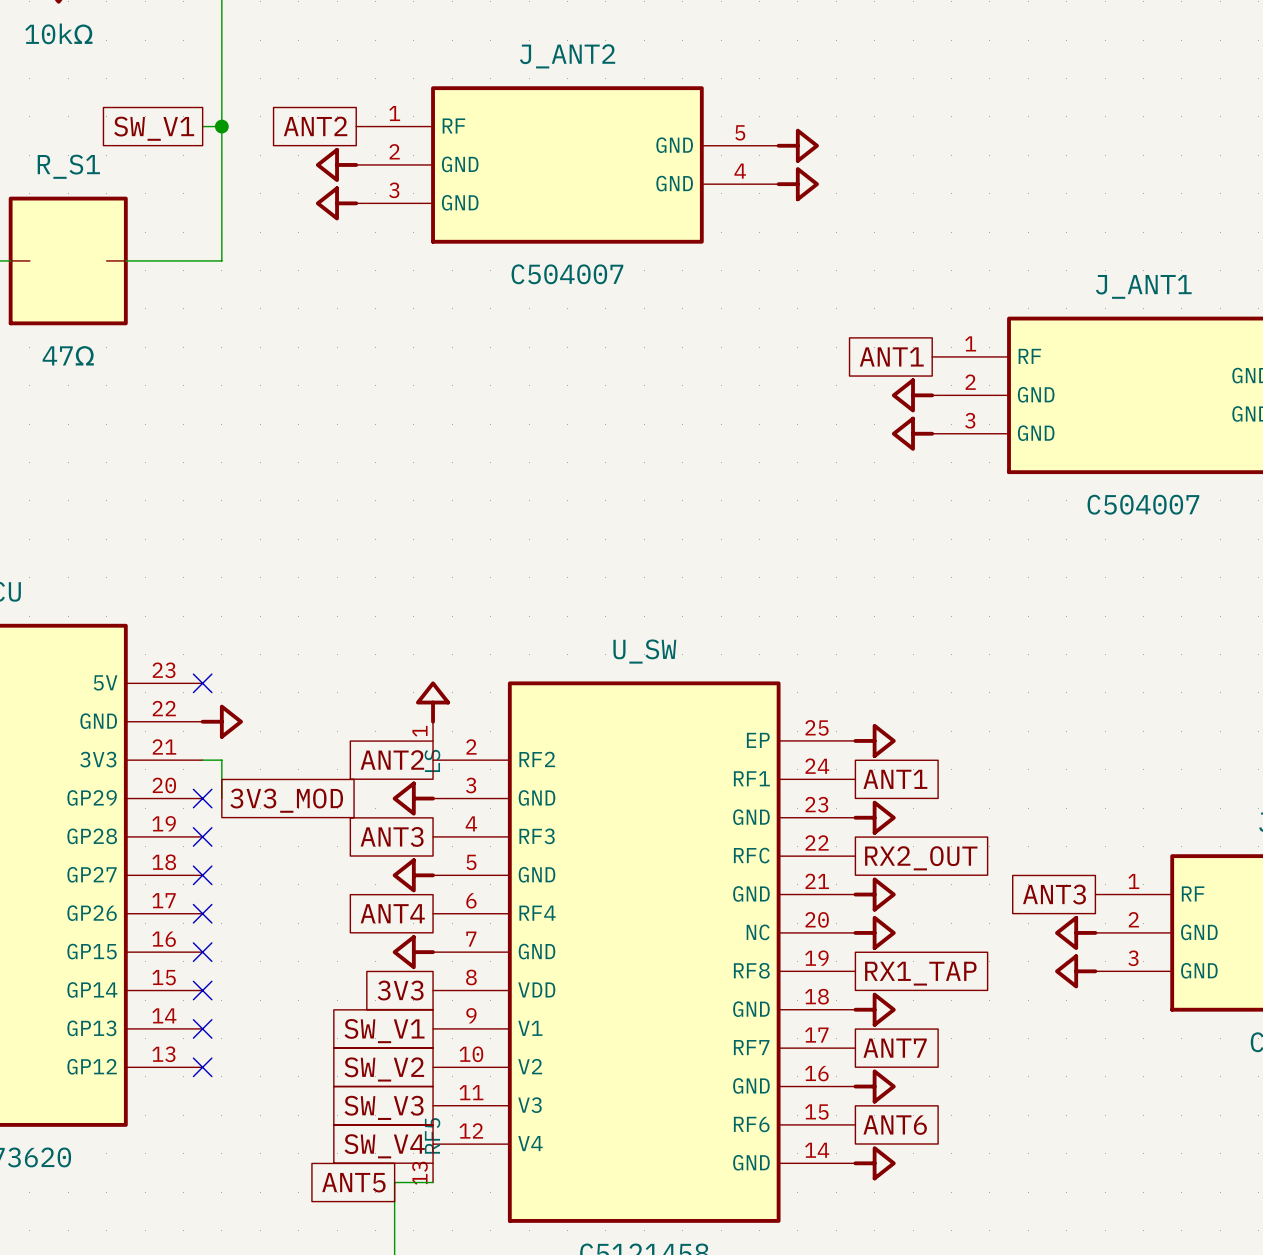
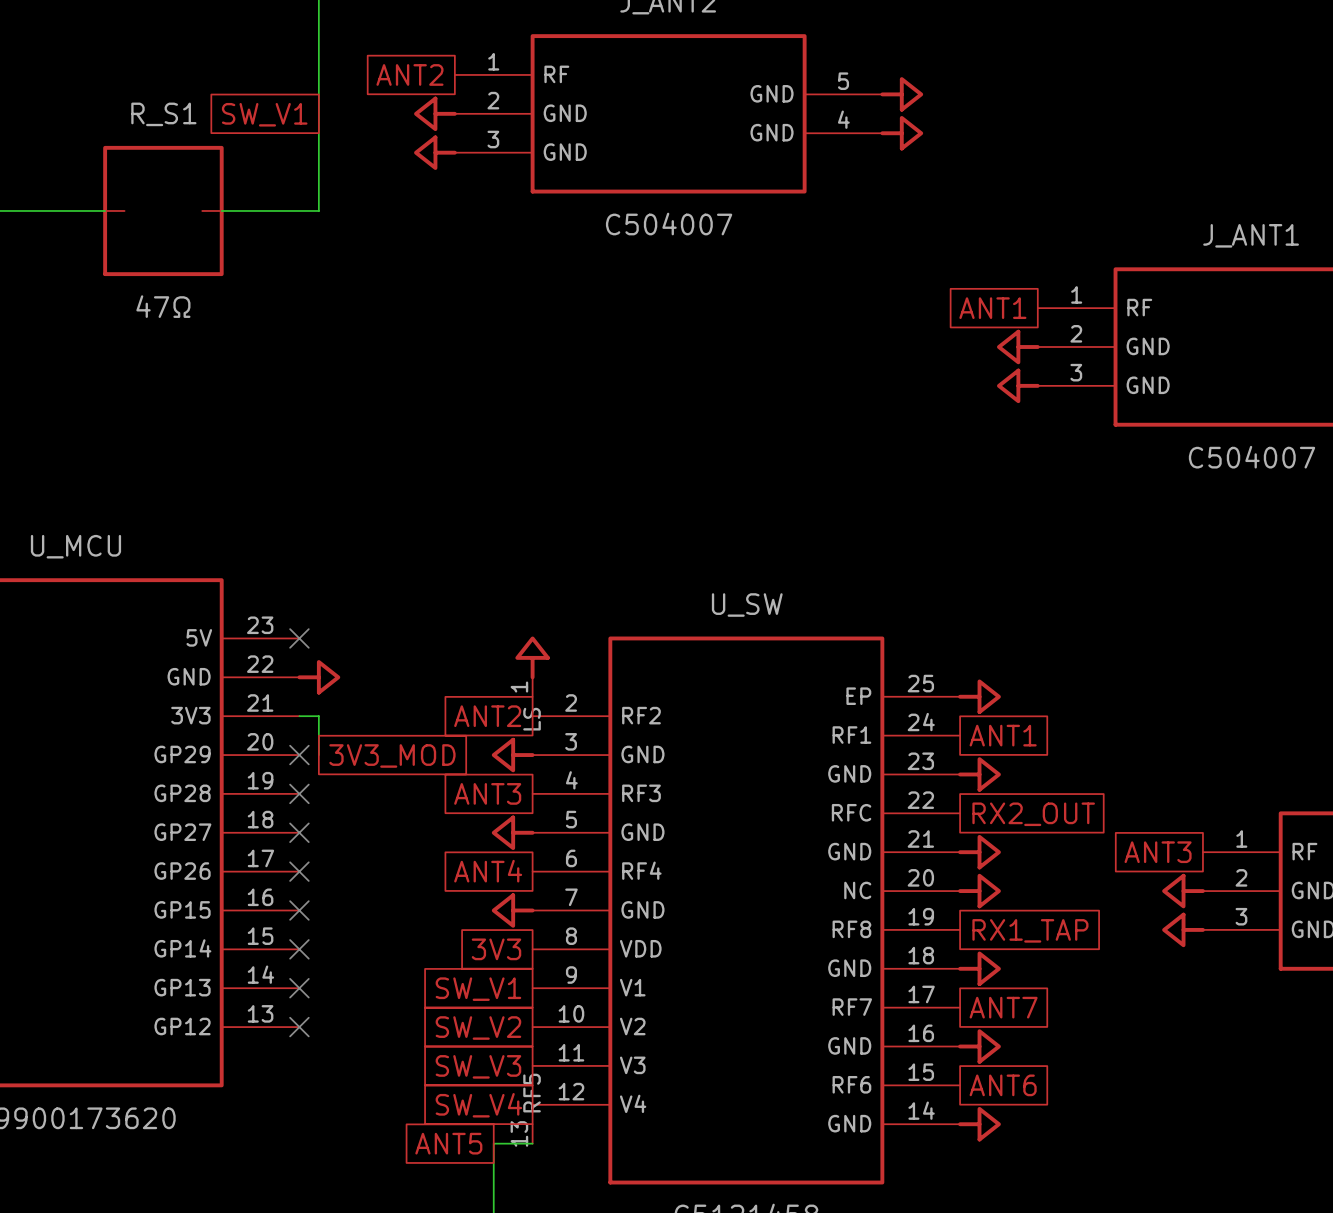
wire: (202, 126) (221, 126) -> none
junction: (221, 126) -> none
global label position: SW_V1 (154, 128) -> SW_V1 (264, 114)

